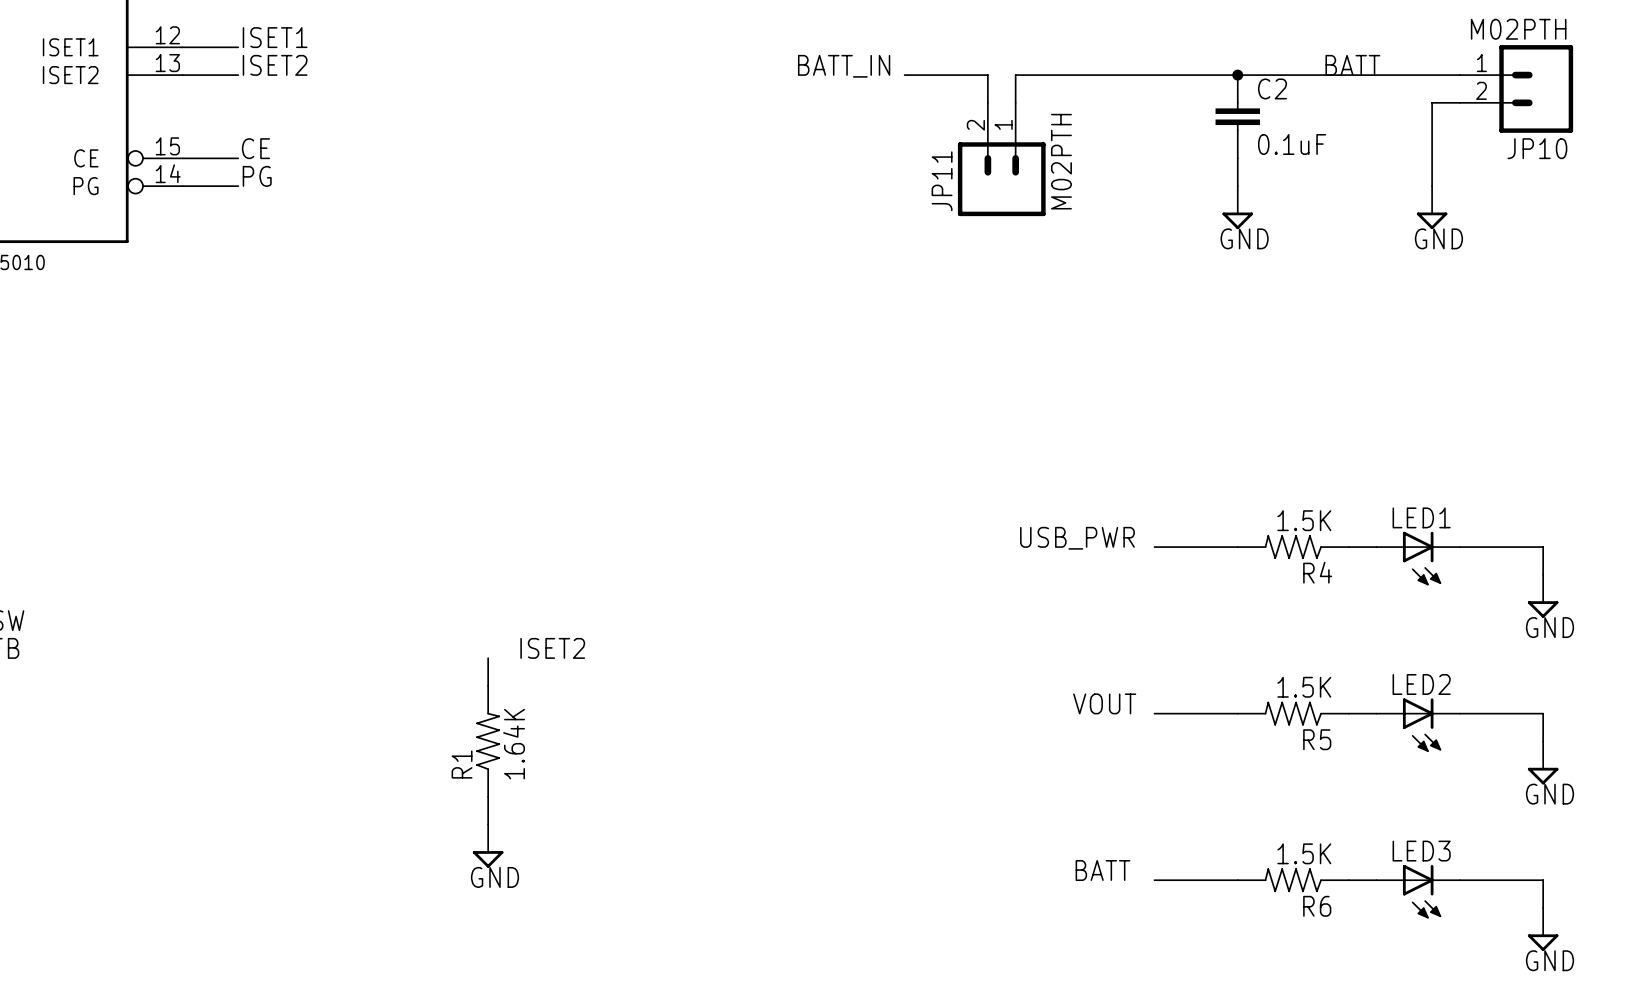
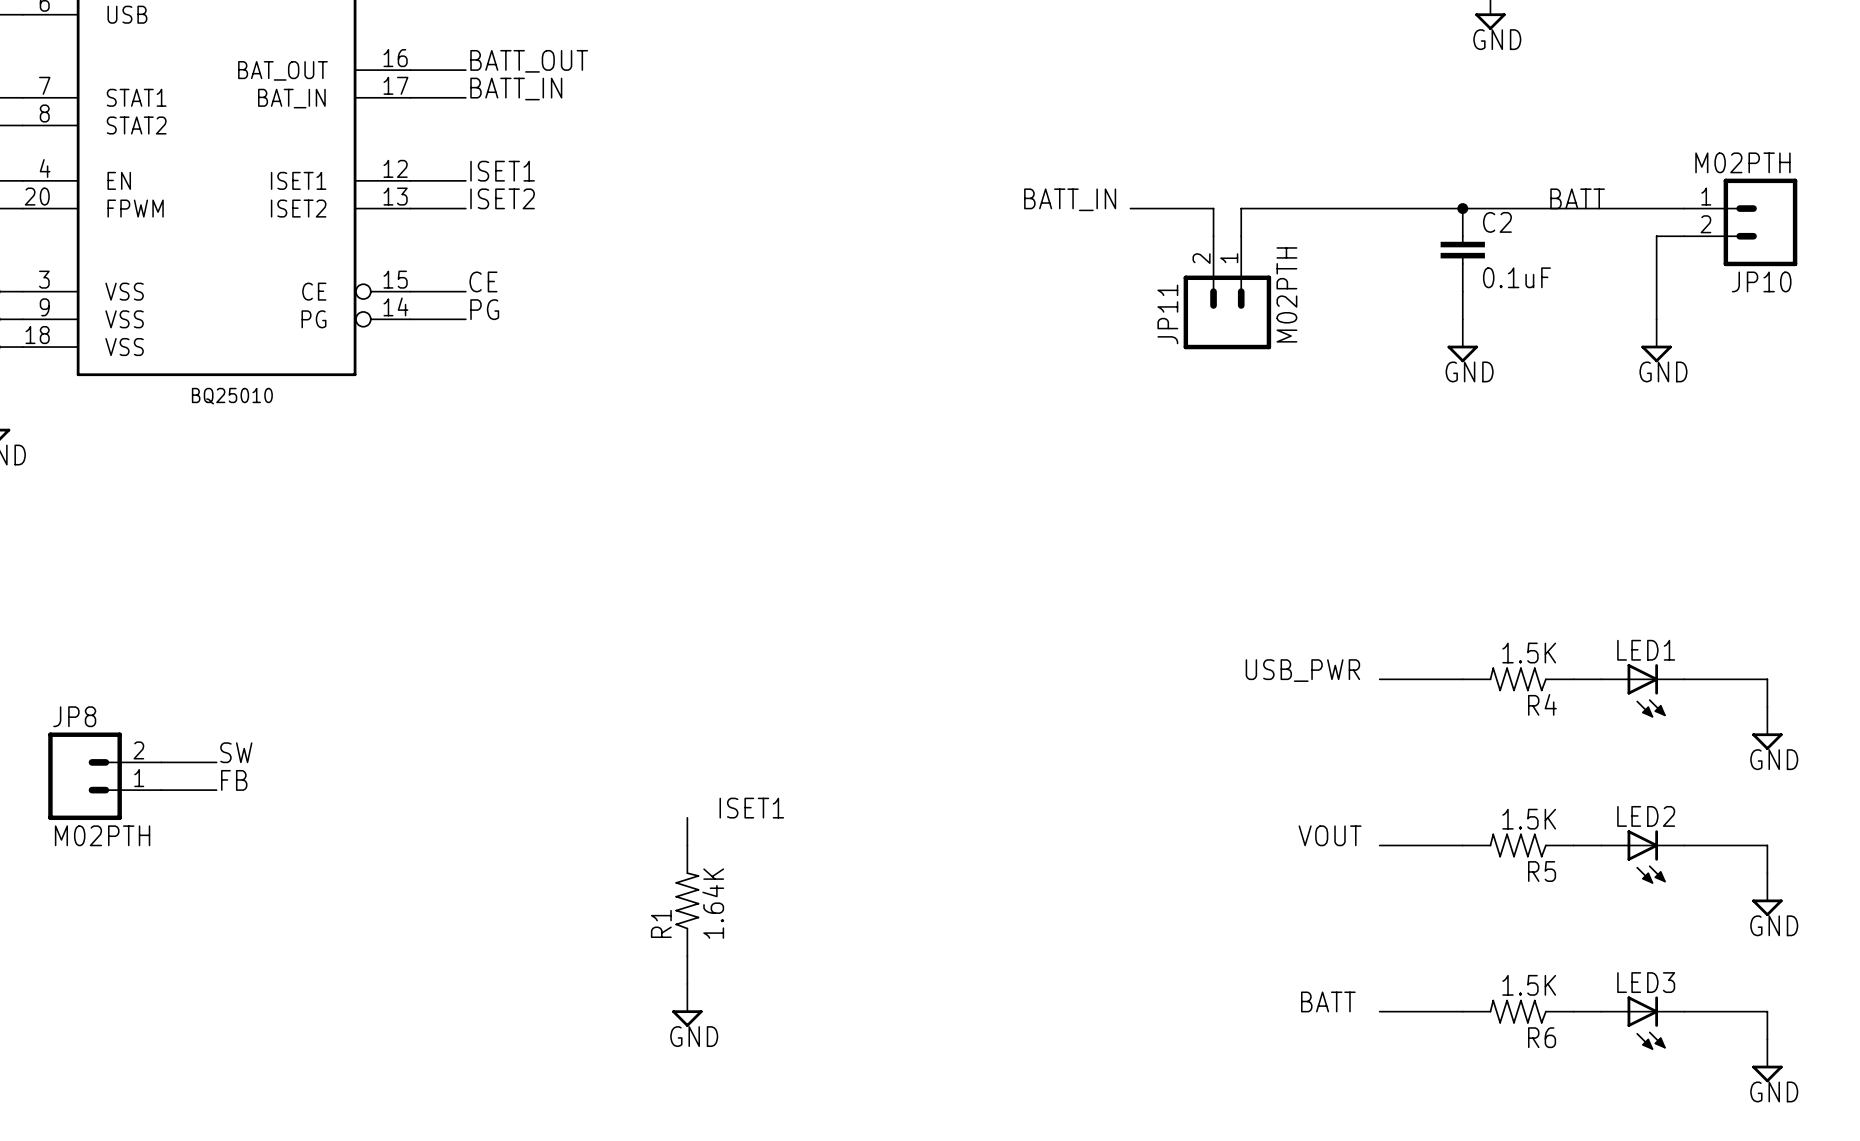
label: ISET2 (552, 648) -> ISET1 (751, 808)
wire: (488, 658) (488, 685) -> (687, 817) (687, 845)
R1 position: (488, 741) -> (687, 900)
wire: (488, 796) (488, 824) -> (687, 956) (687, 983)
power symbol position: GND (488, 846) -> GND (687, 1005)

